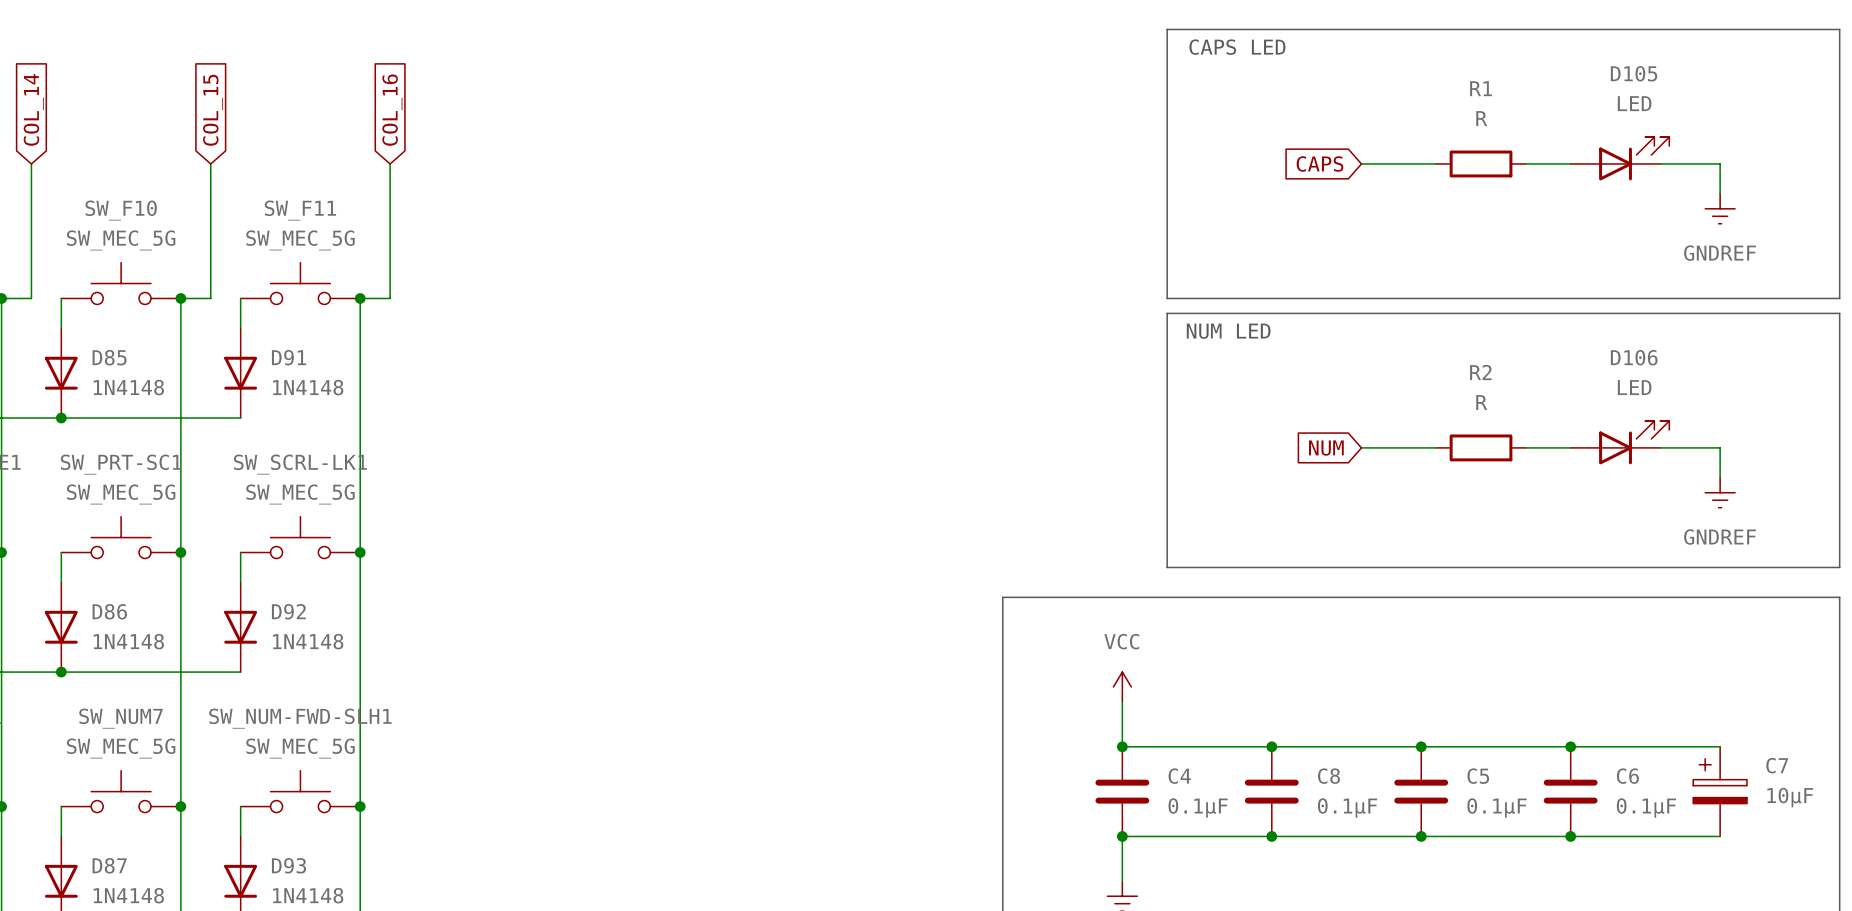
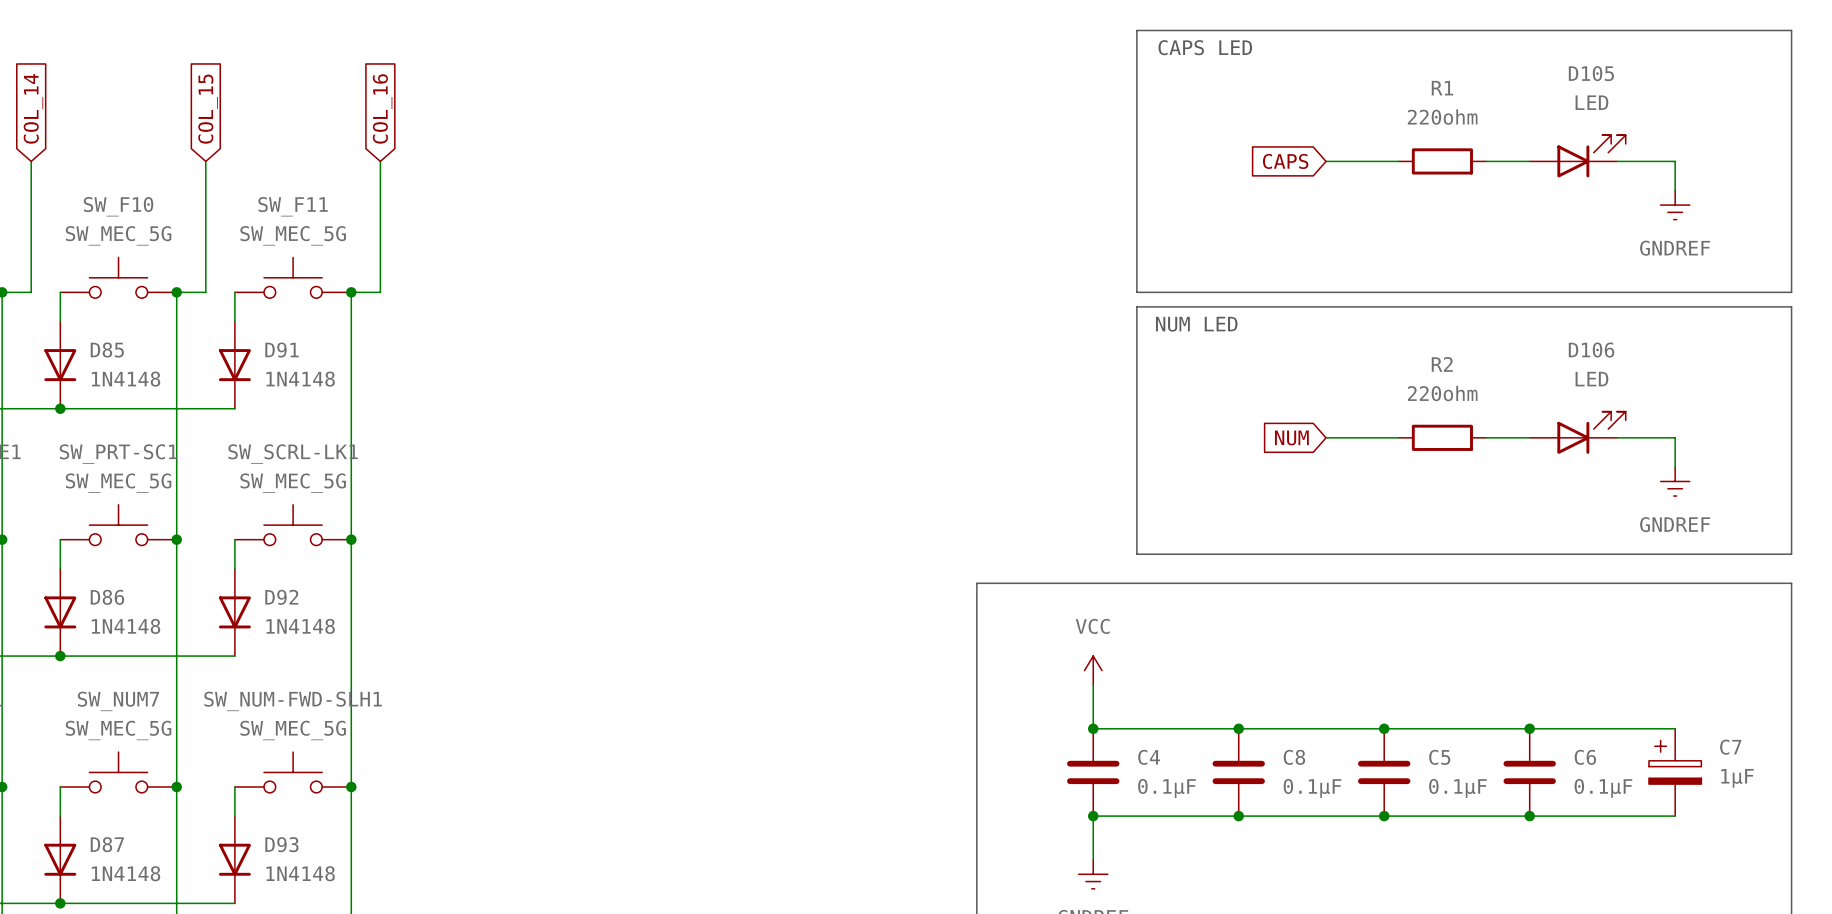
R1 value: R (1481, 118) -> 220ohm (1442, 117)
R2 value: R (1481, 402) -> 220ohm (1442, 393)
C7 value: 10µF (1790, 797) -> 1µF (1737, 778)

